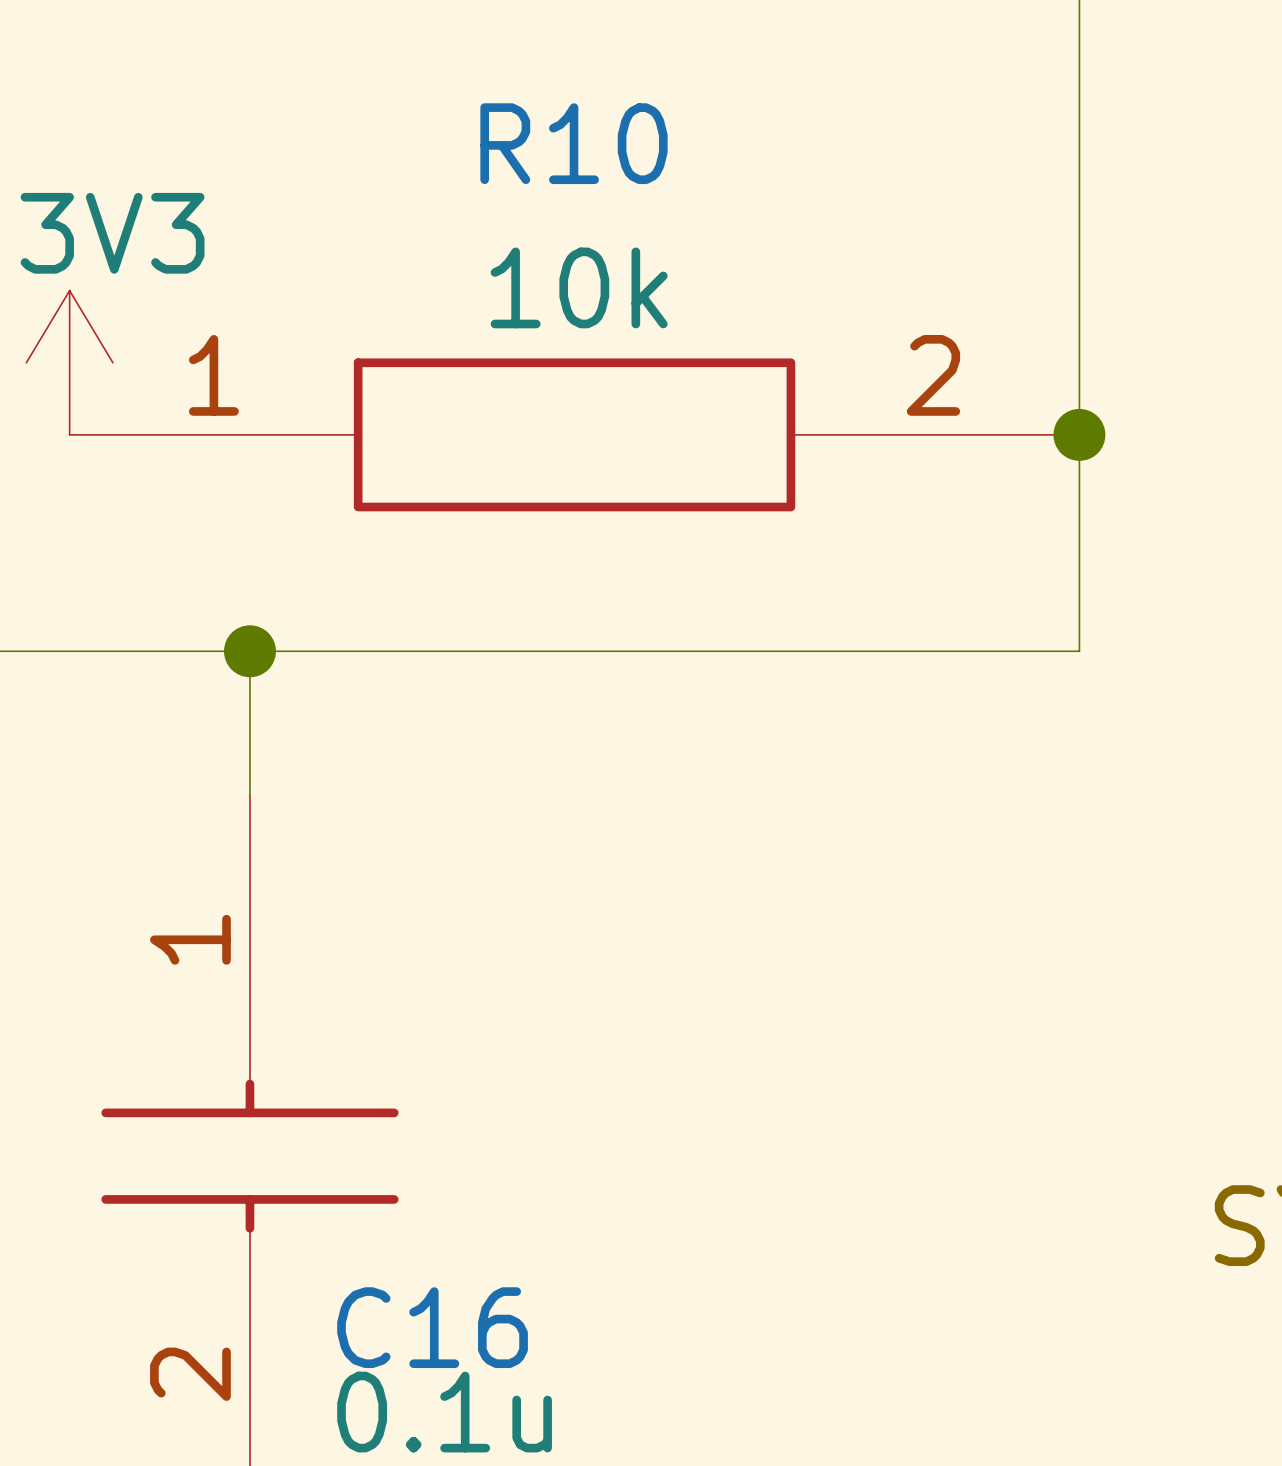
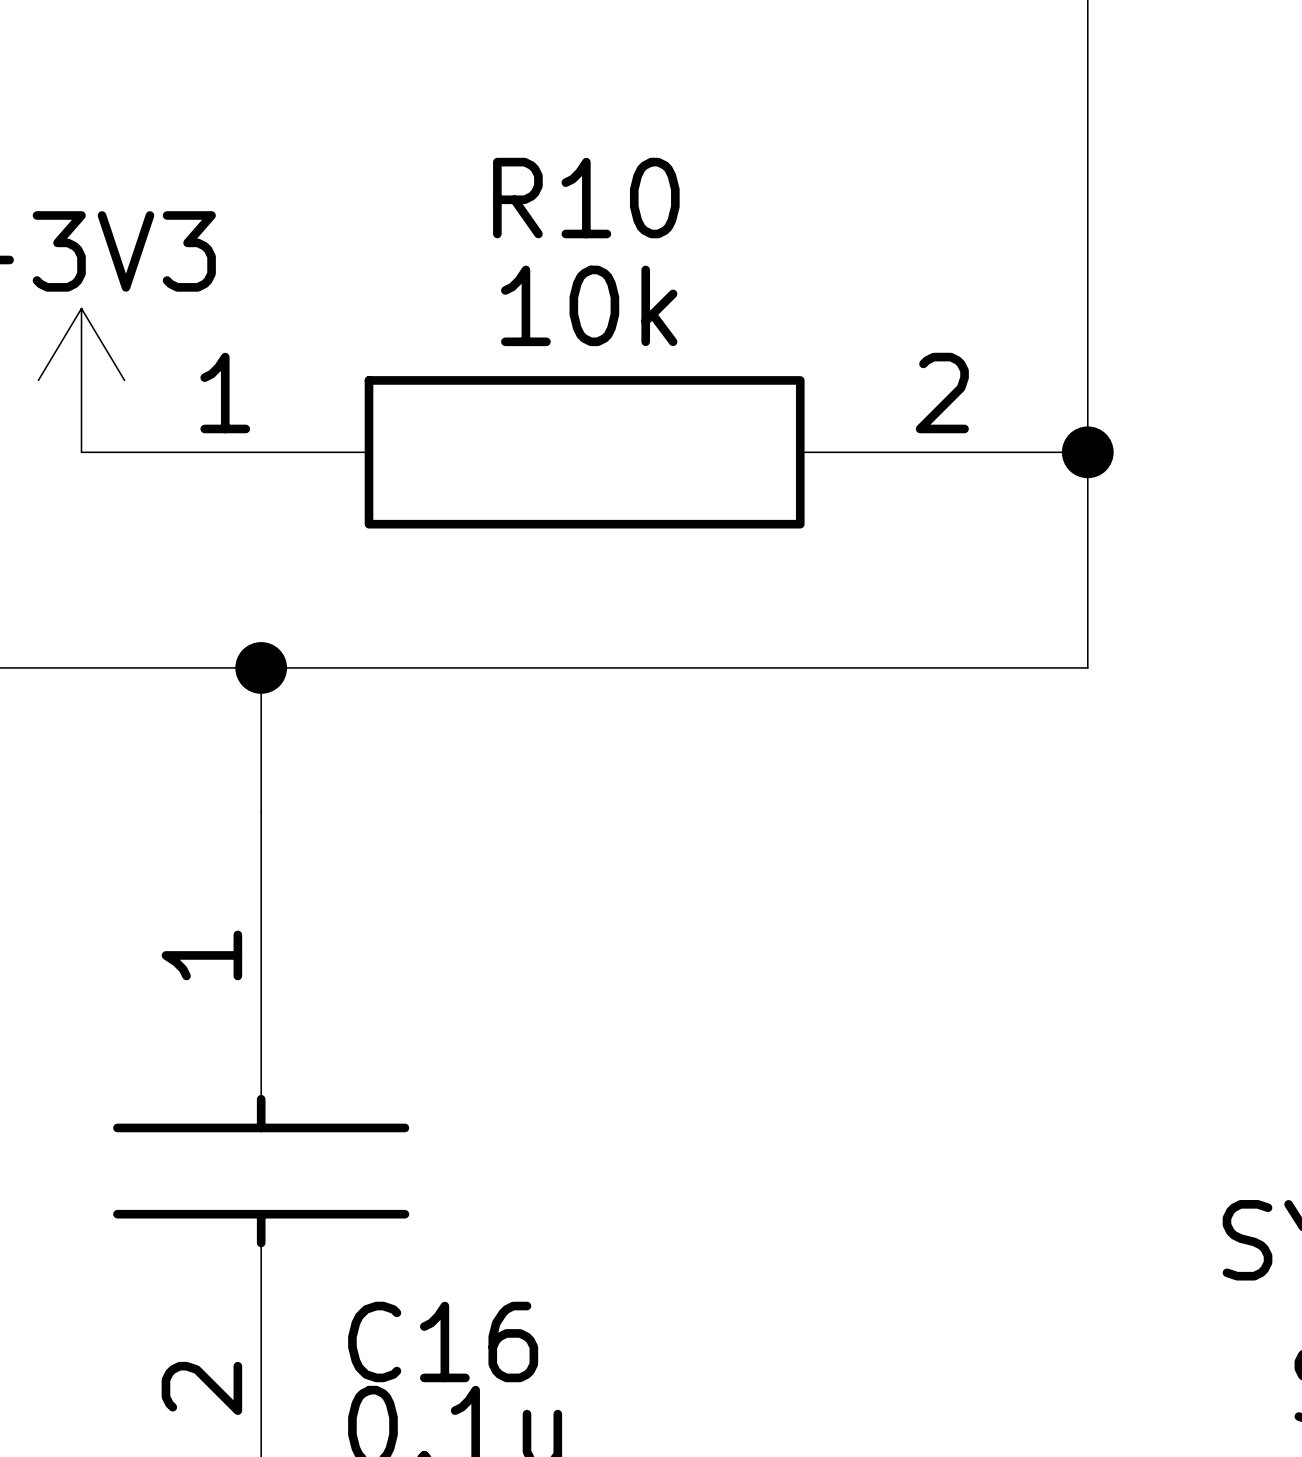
R10 name position: R10 (573, 143) -> R10 (586, 198)

